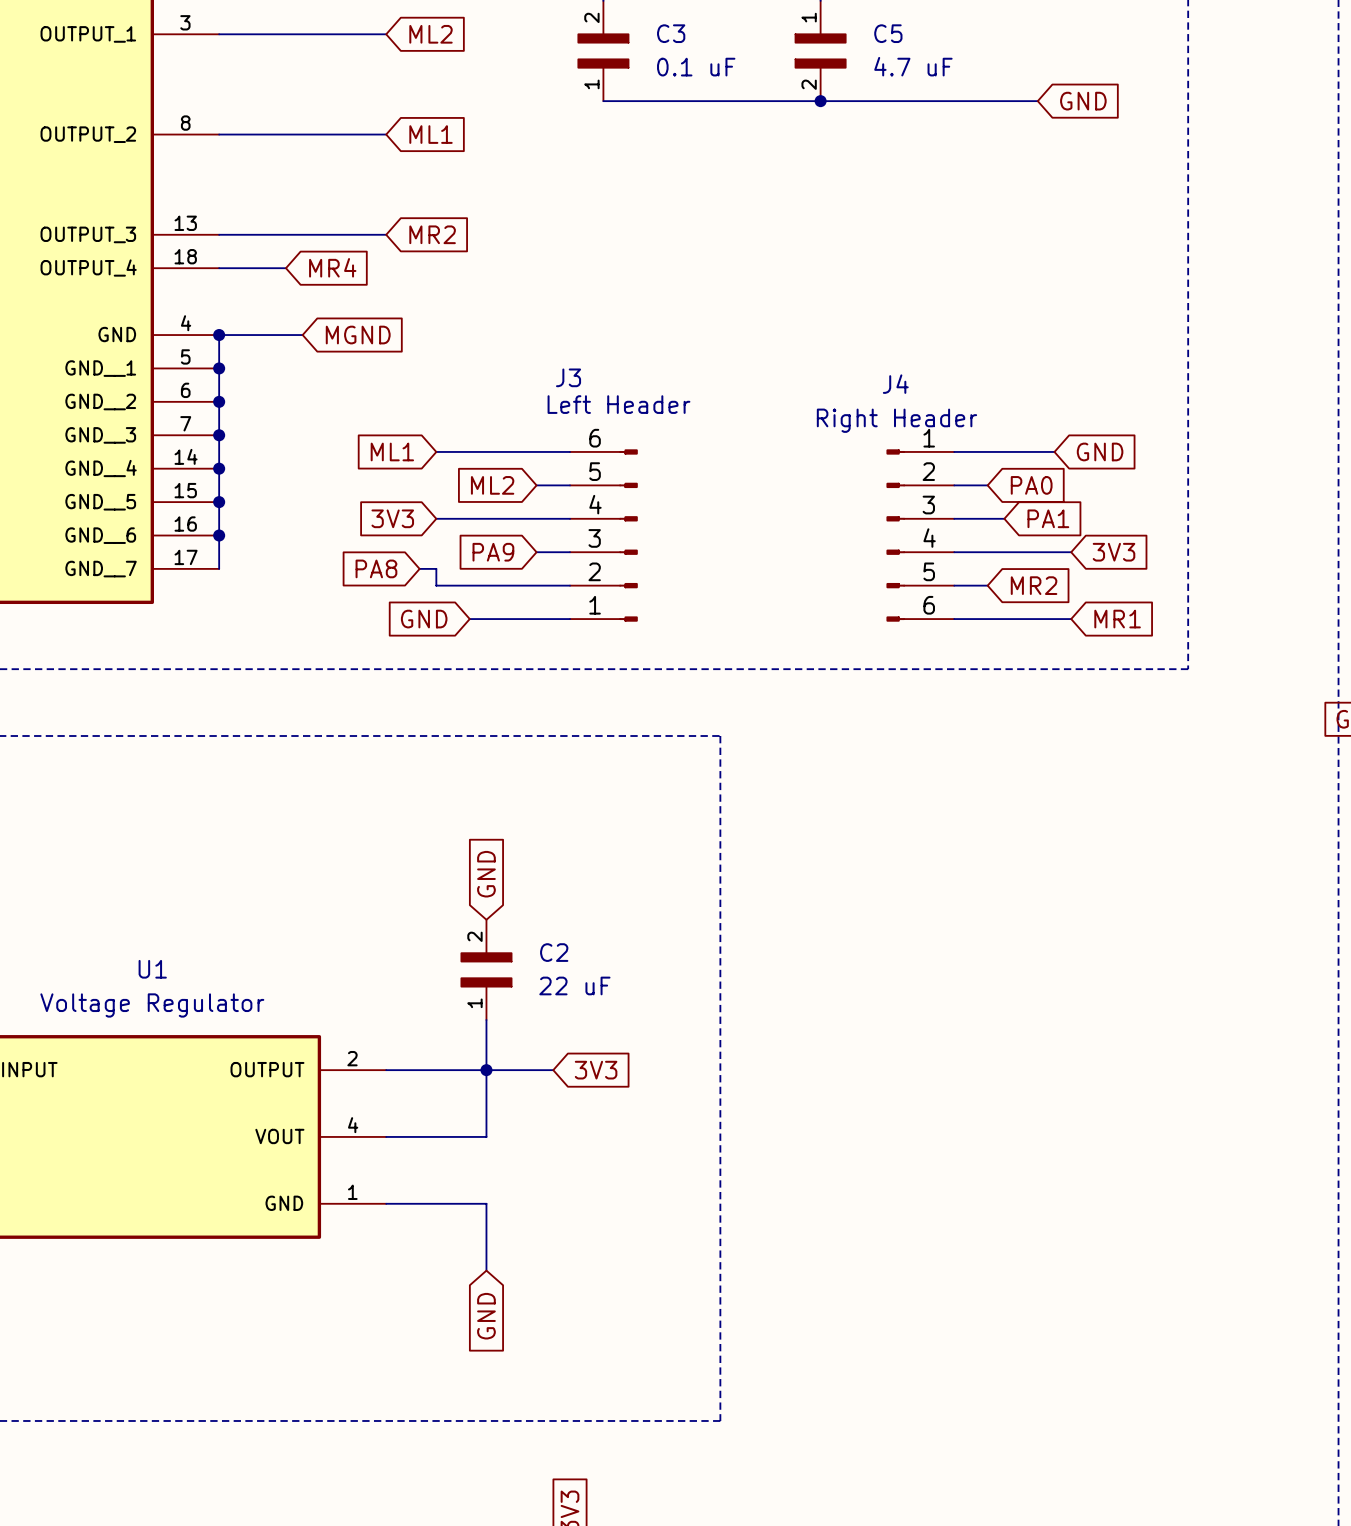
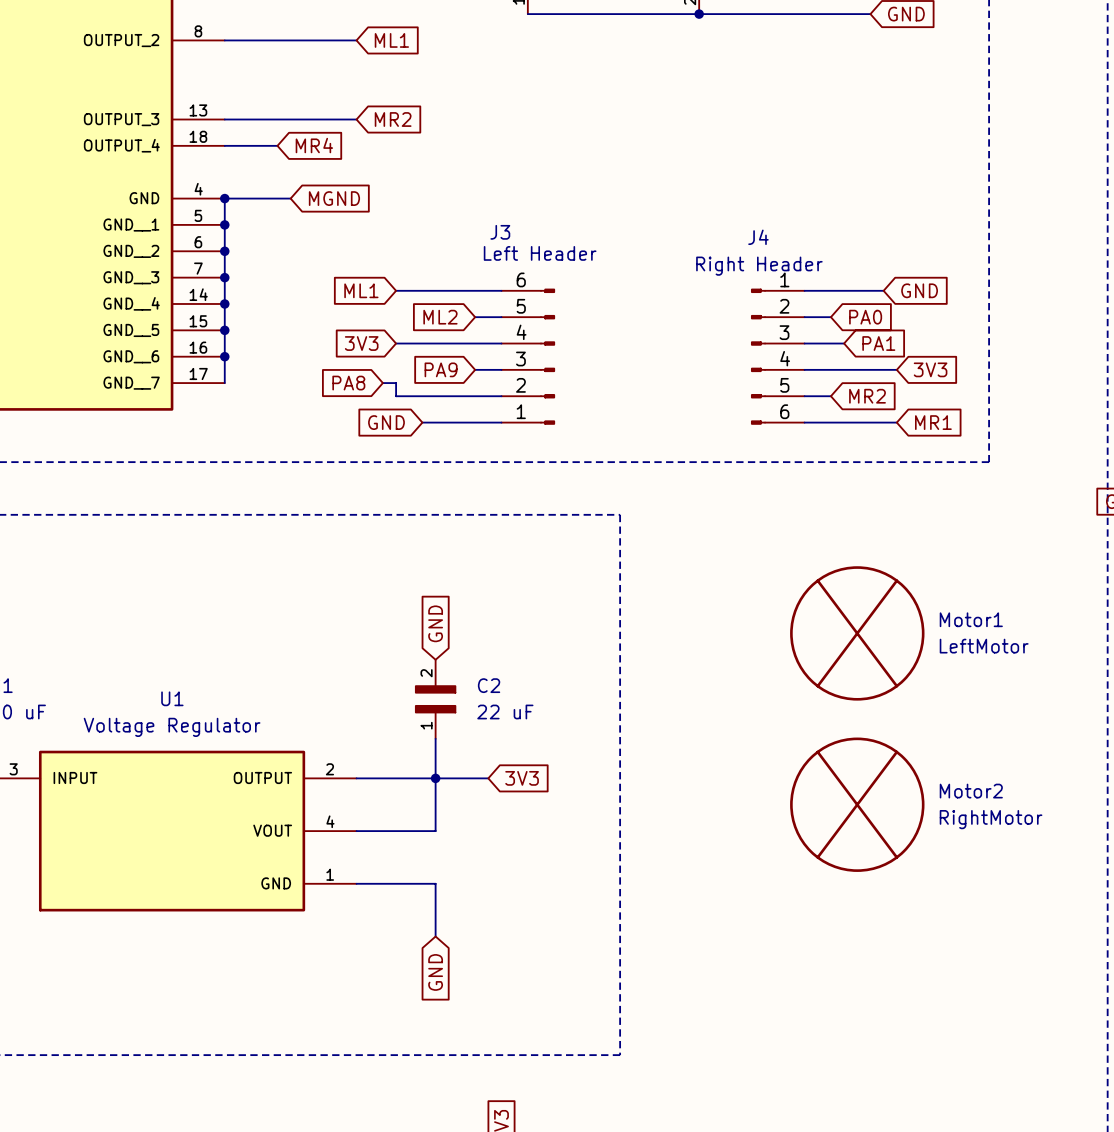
Motor1: none -> LeftMotor (857, 633)
Motor2: none -> RightMotor (857, 804)

